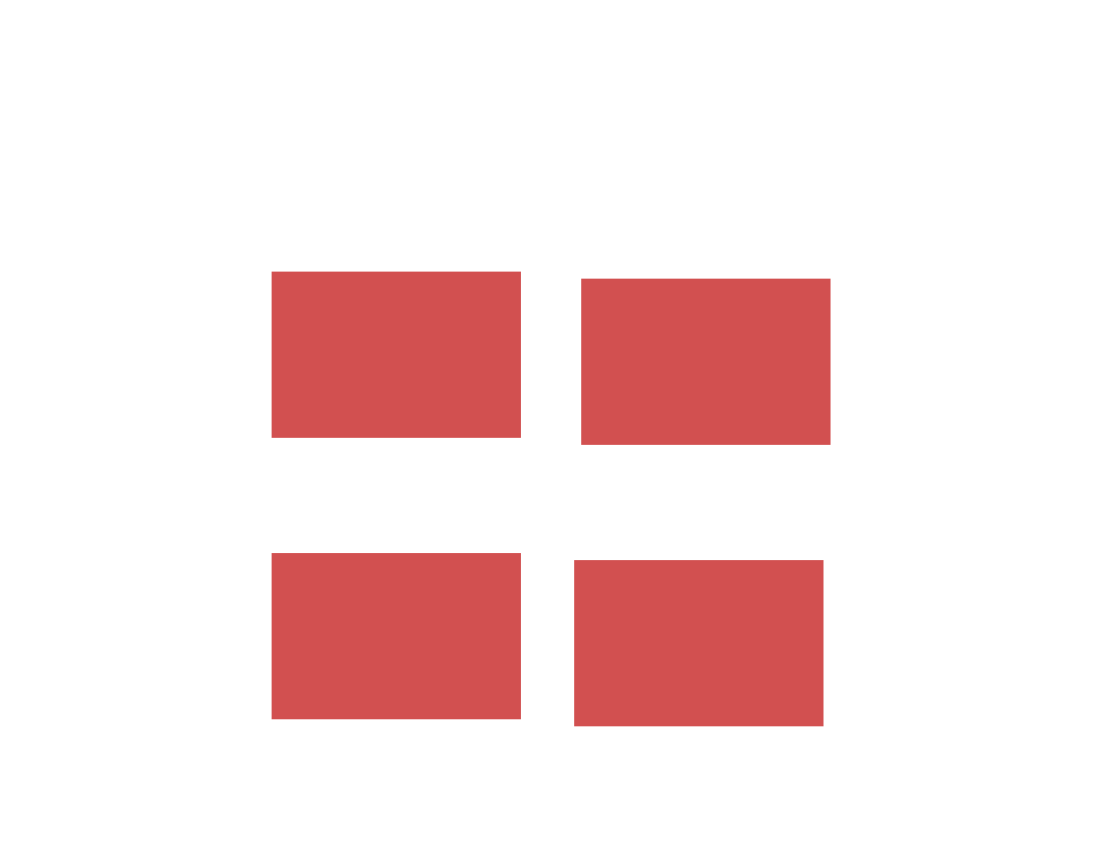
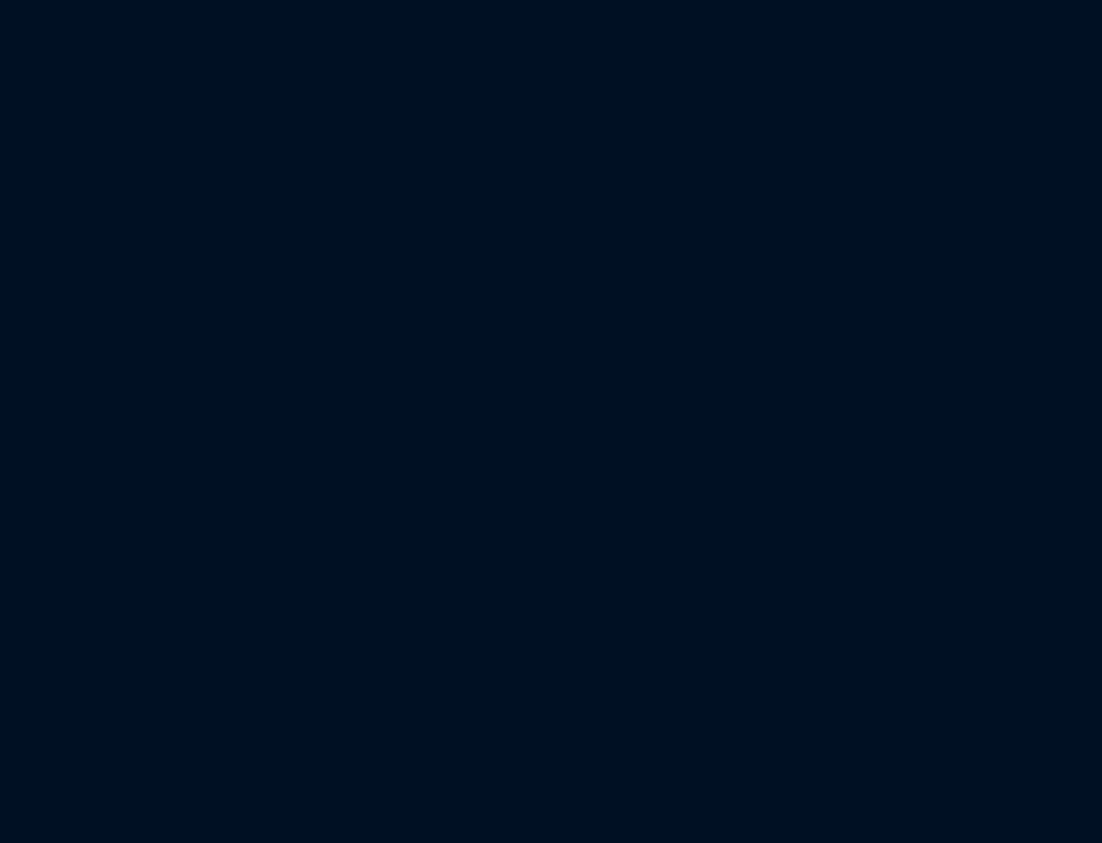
part: (396, 354) -> none
part: (705, 361) -> none
part: (396, 636) -> none
part: (698, 643) -> none

